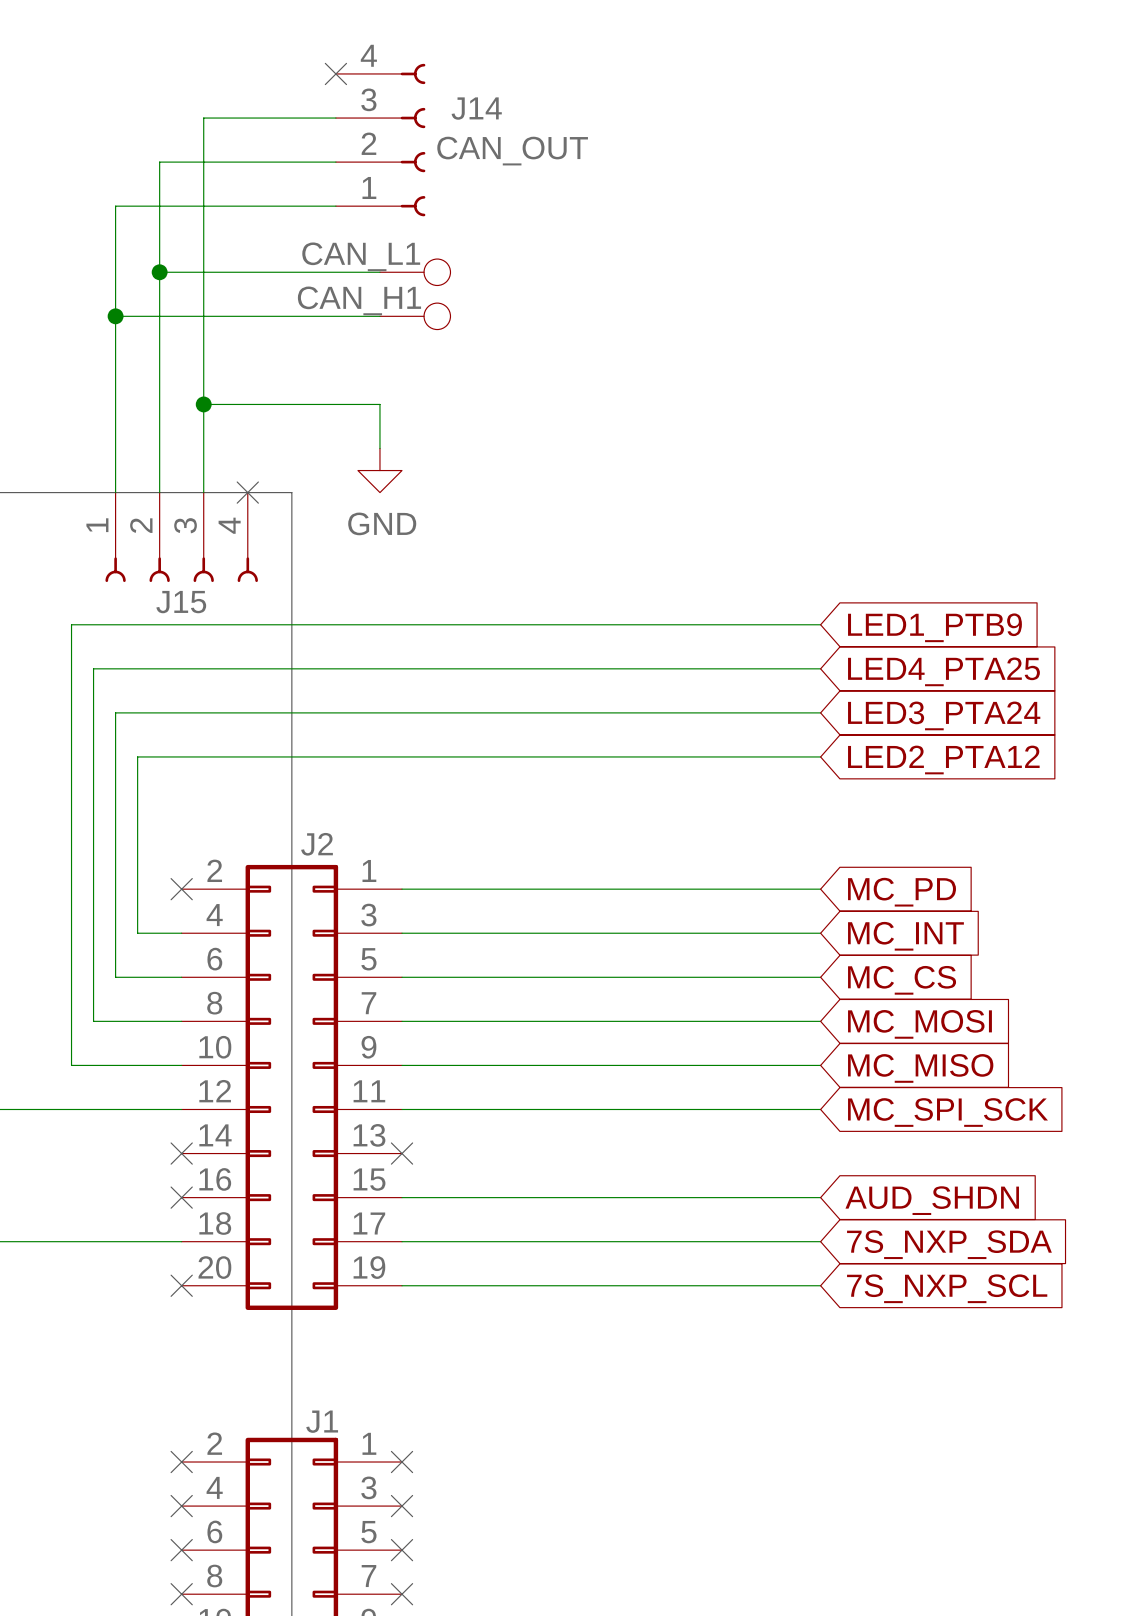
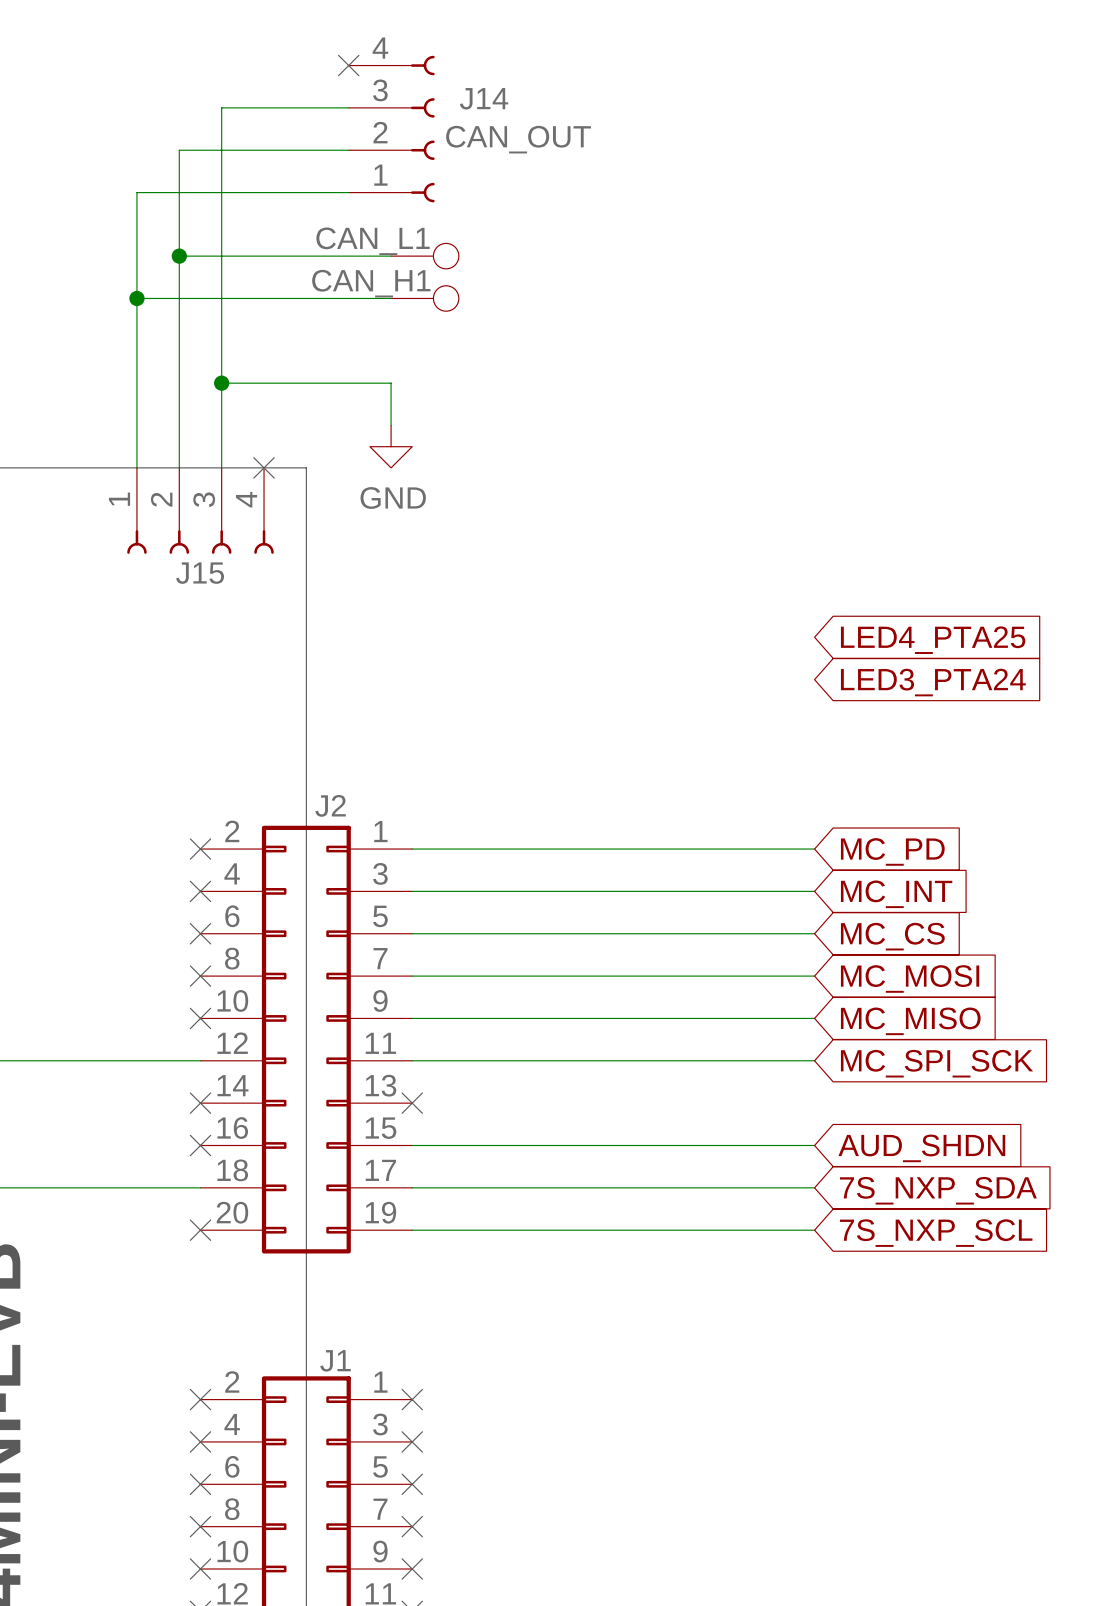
wire: (820, 624) (71, 624) (71, 1065) (181, 1065) -> none
global label: LED1_PTB9 (934, 627) -> none
wire: (820, 668) (93, 668) (93, 1021) (181, 1021) -> none
wire: (820, 712) (115, 712) (115, 977) (181, 977) -> none
wire: (820, 756) (137, 756) (137, 933) (181, 933) -> none
global label: LED2_PTA12 (943, 759) -> none
no-connect mark: none -> (200, 891)
no-connect mark: none -> (200, 933)
no-connect mark: none -> (200, 976)
no-connect mark: none -> (200, 1018)

